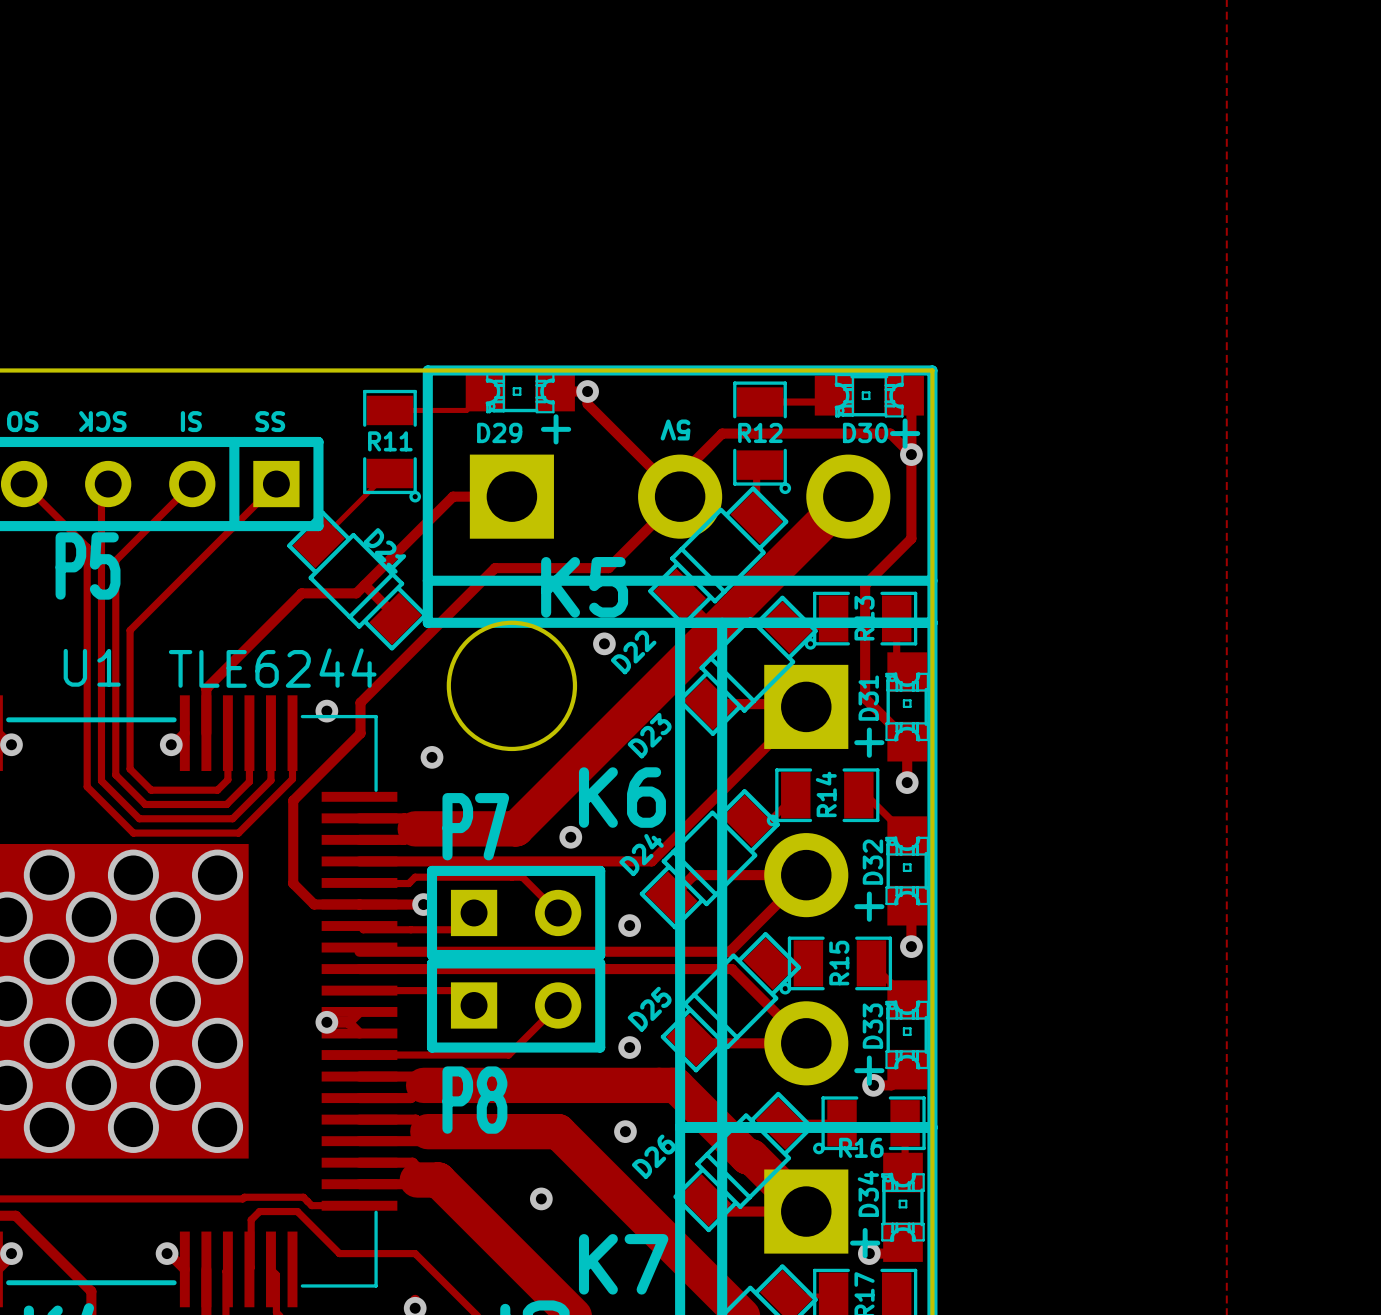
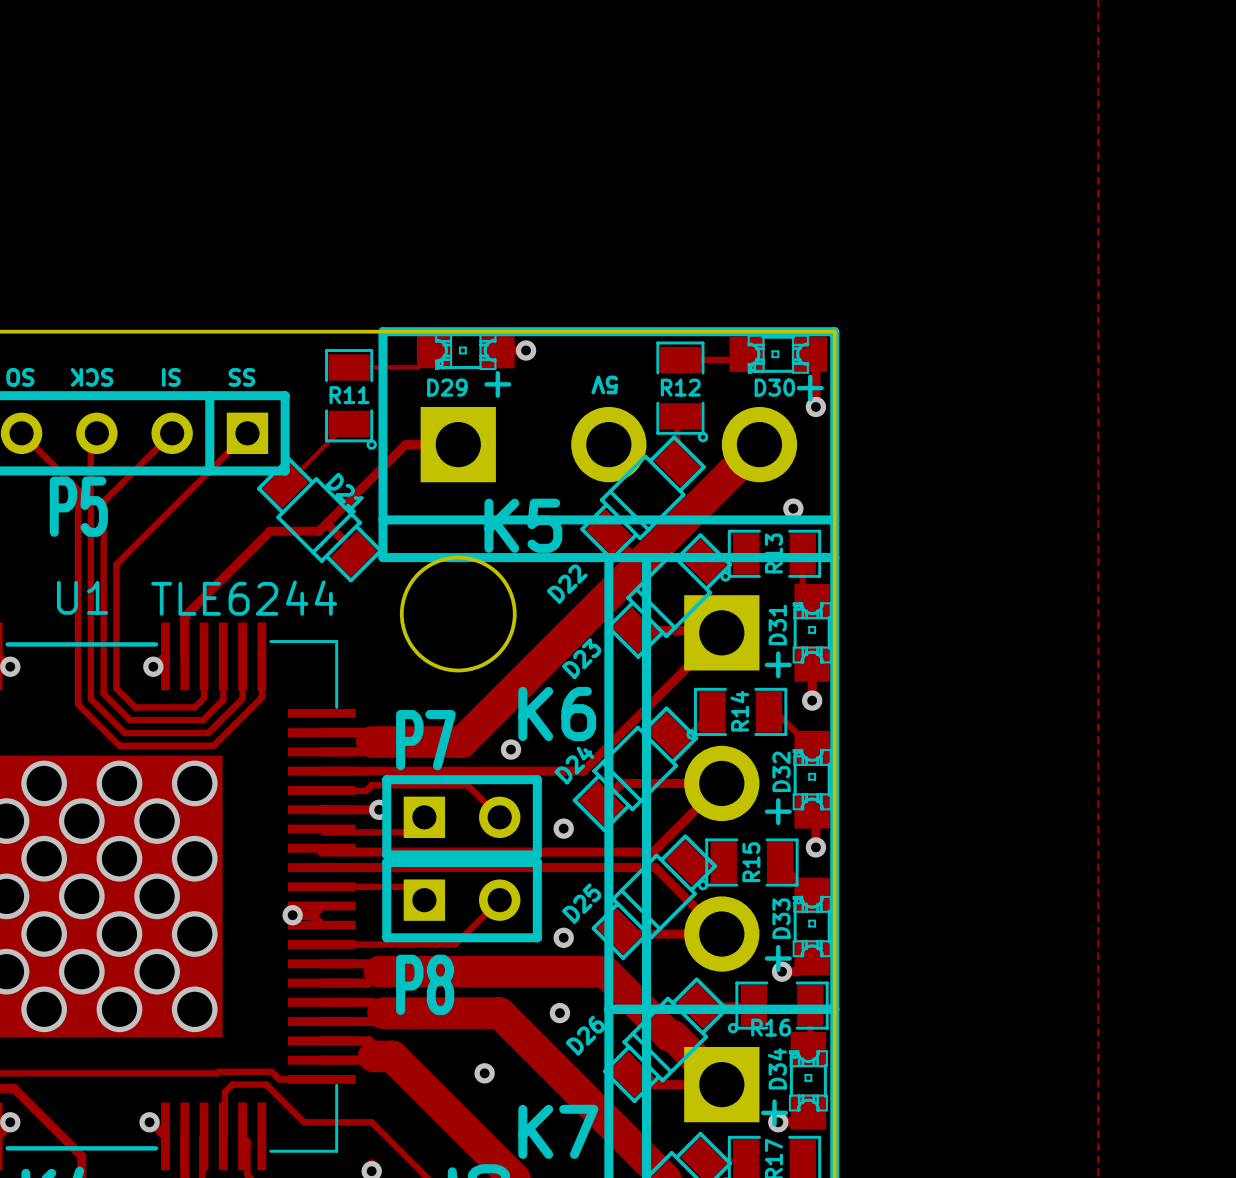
track: (587, 391) (587, 404) (680, 496) -> none
track: (680, 496) (680, 475) (722, 433) (890, 433) (911, 454) (911, 538) (865, 584) (865, 698) (907, 741) -> none
track: (680, 496) (608, 568) (495, 568) (360, 702) (360, 733) (293, 800) (293, 883) (314, 904) (359, 904) -> none
via: none -> (793, 508)
via: (604, 643) -> none
via: (326, 711) -> none
via: (432, 757) -> none

